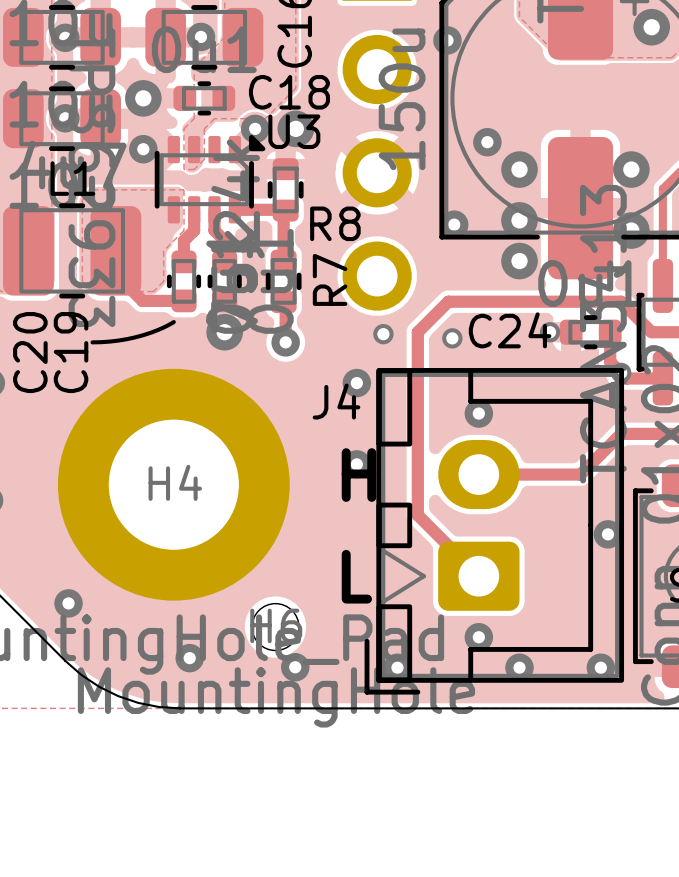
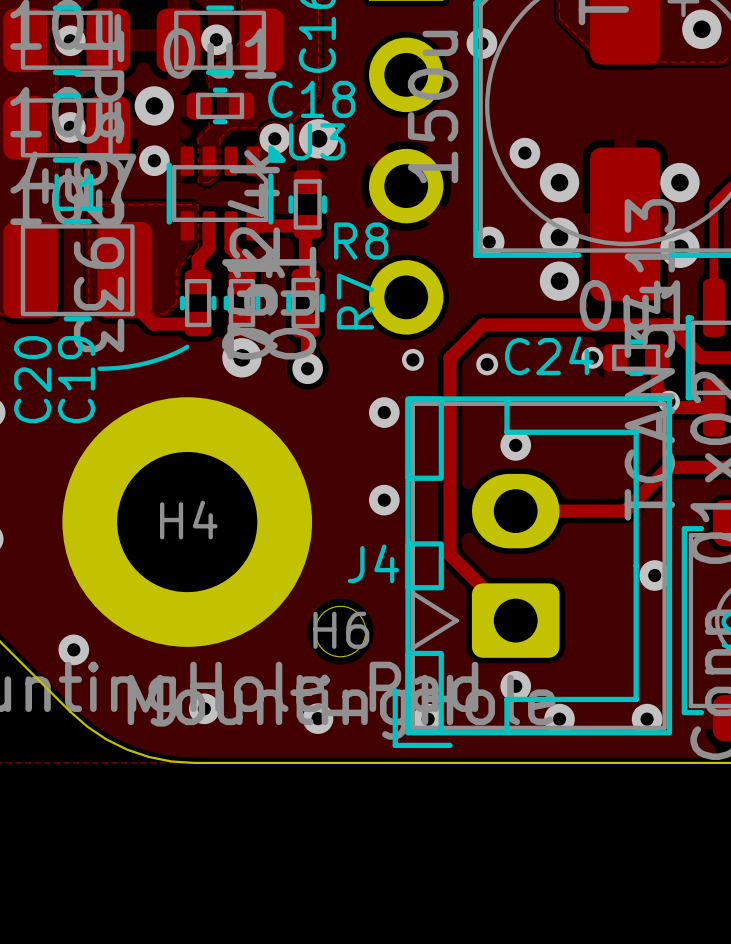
J4 name position: J4 (336, 401) -> J4 (373, 563)
text: H (358, 475) -> none
text: L (356, 576) -> none
H6 position: (275, 627) -> (340, 631)

